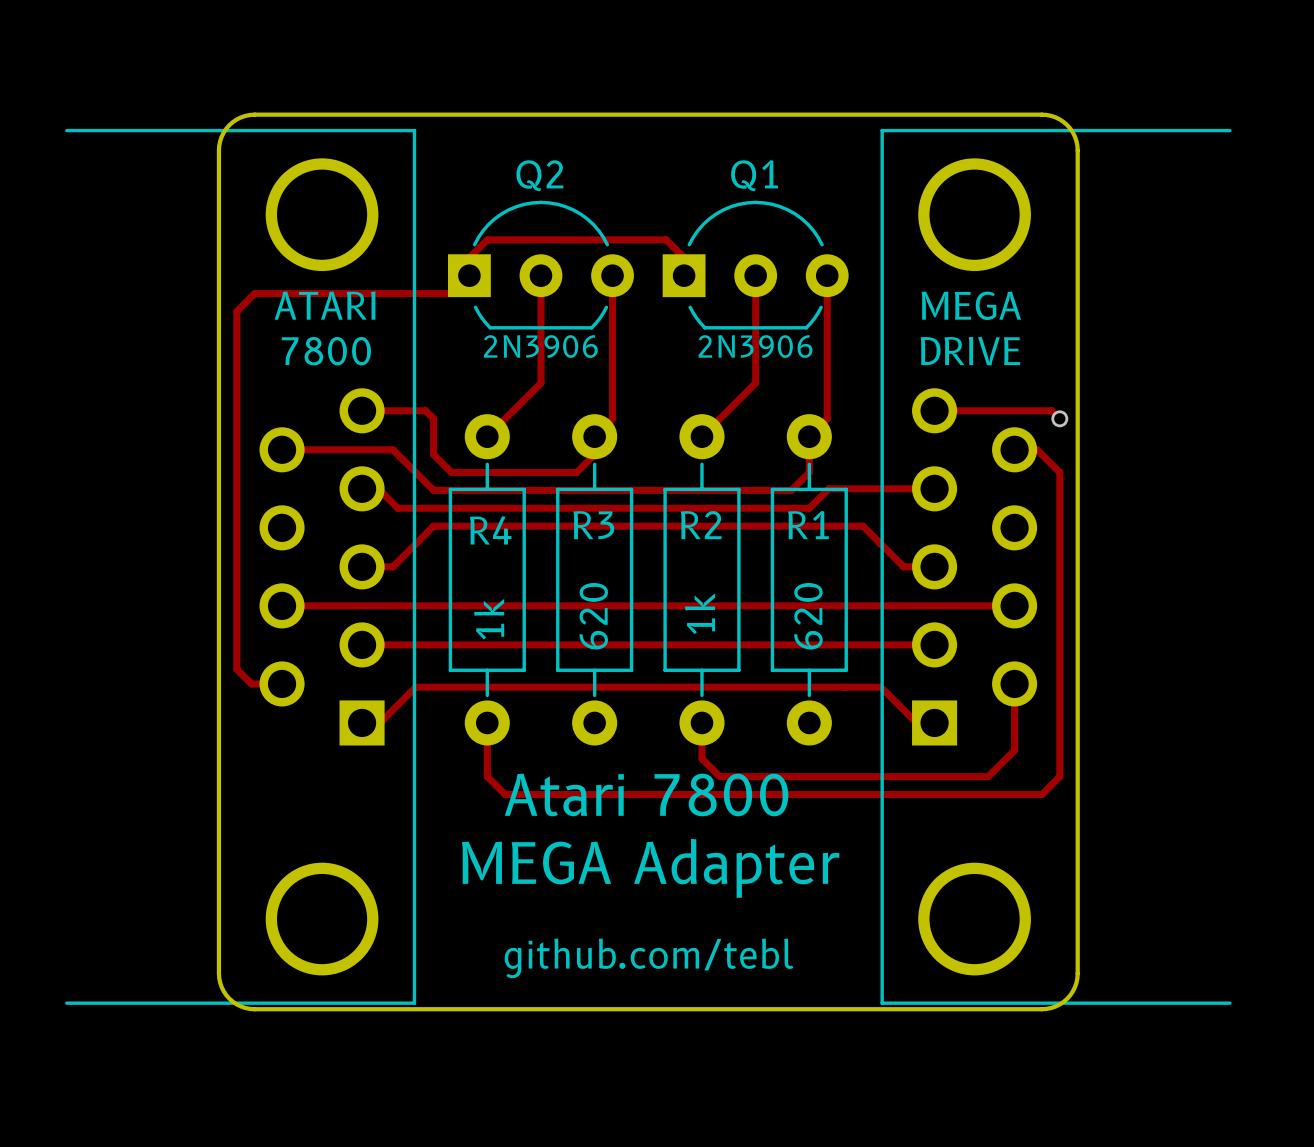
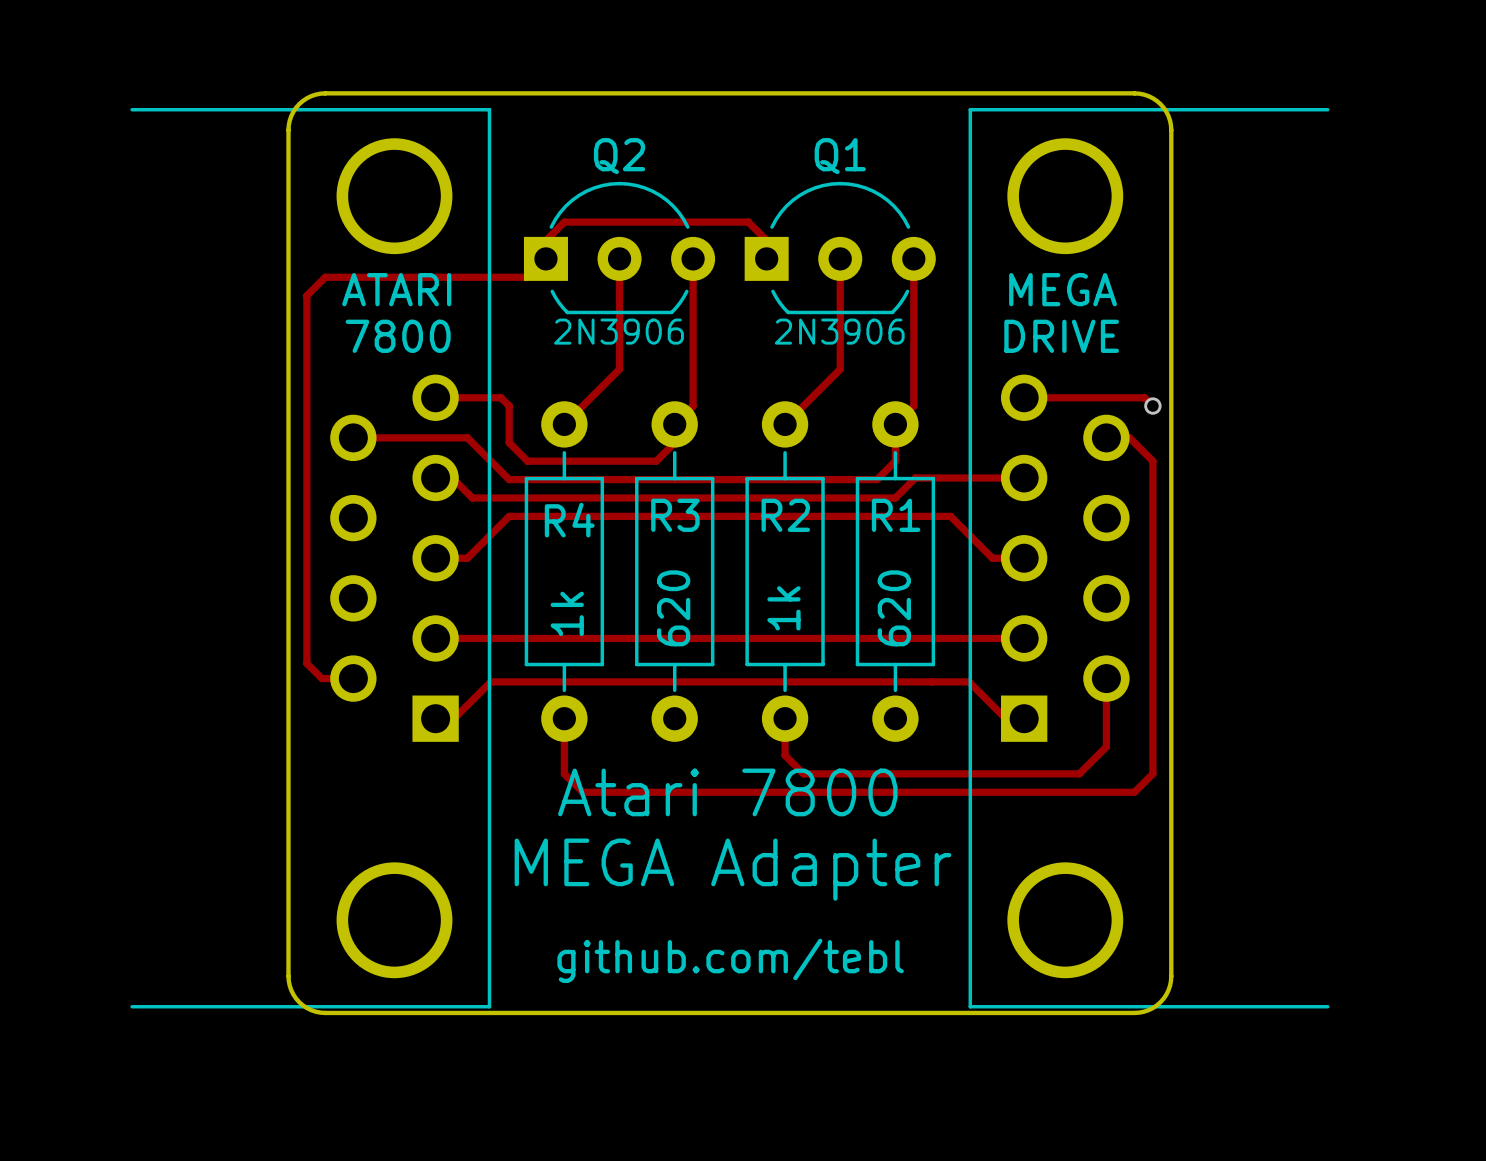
track: (282, 605) (1014, 605) -> none

